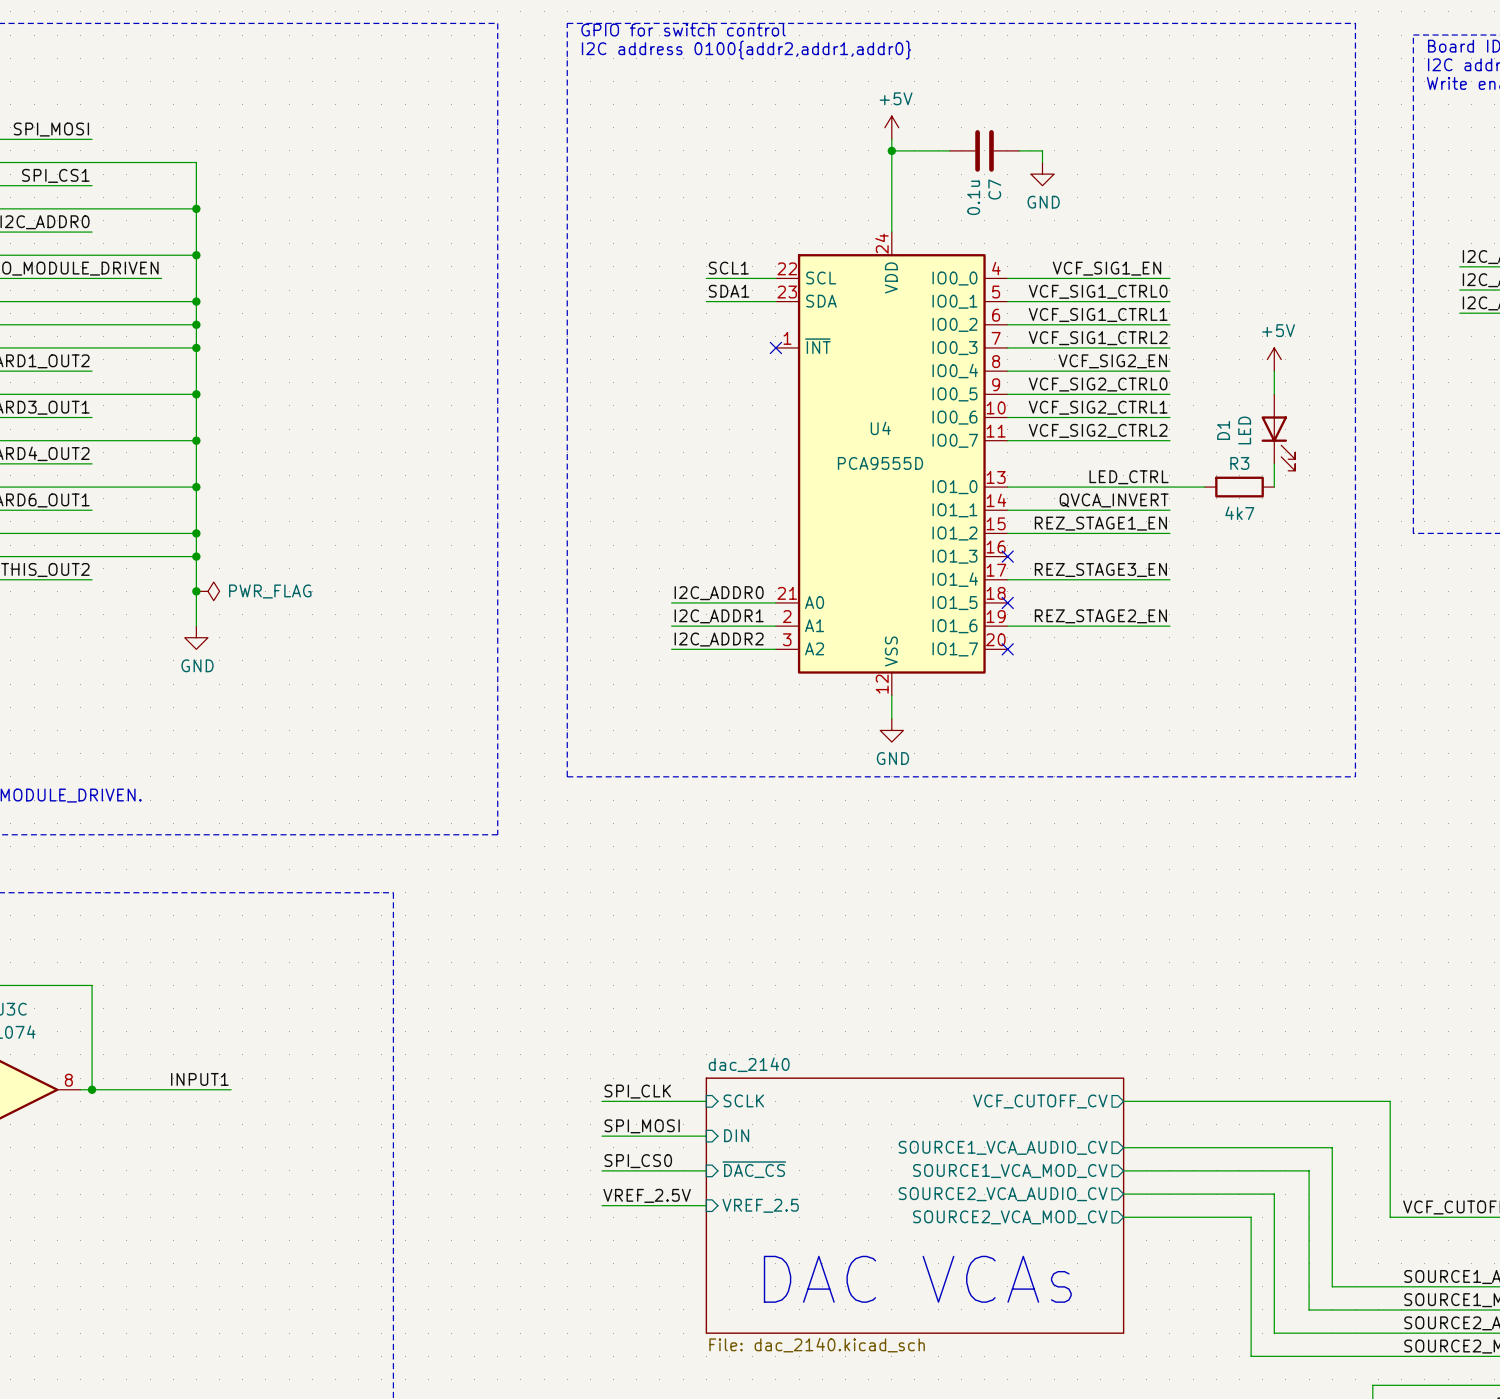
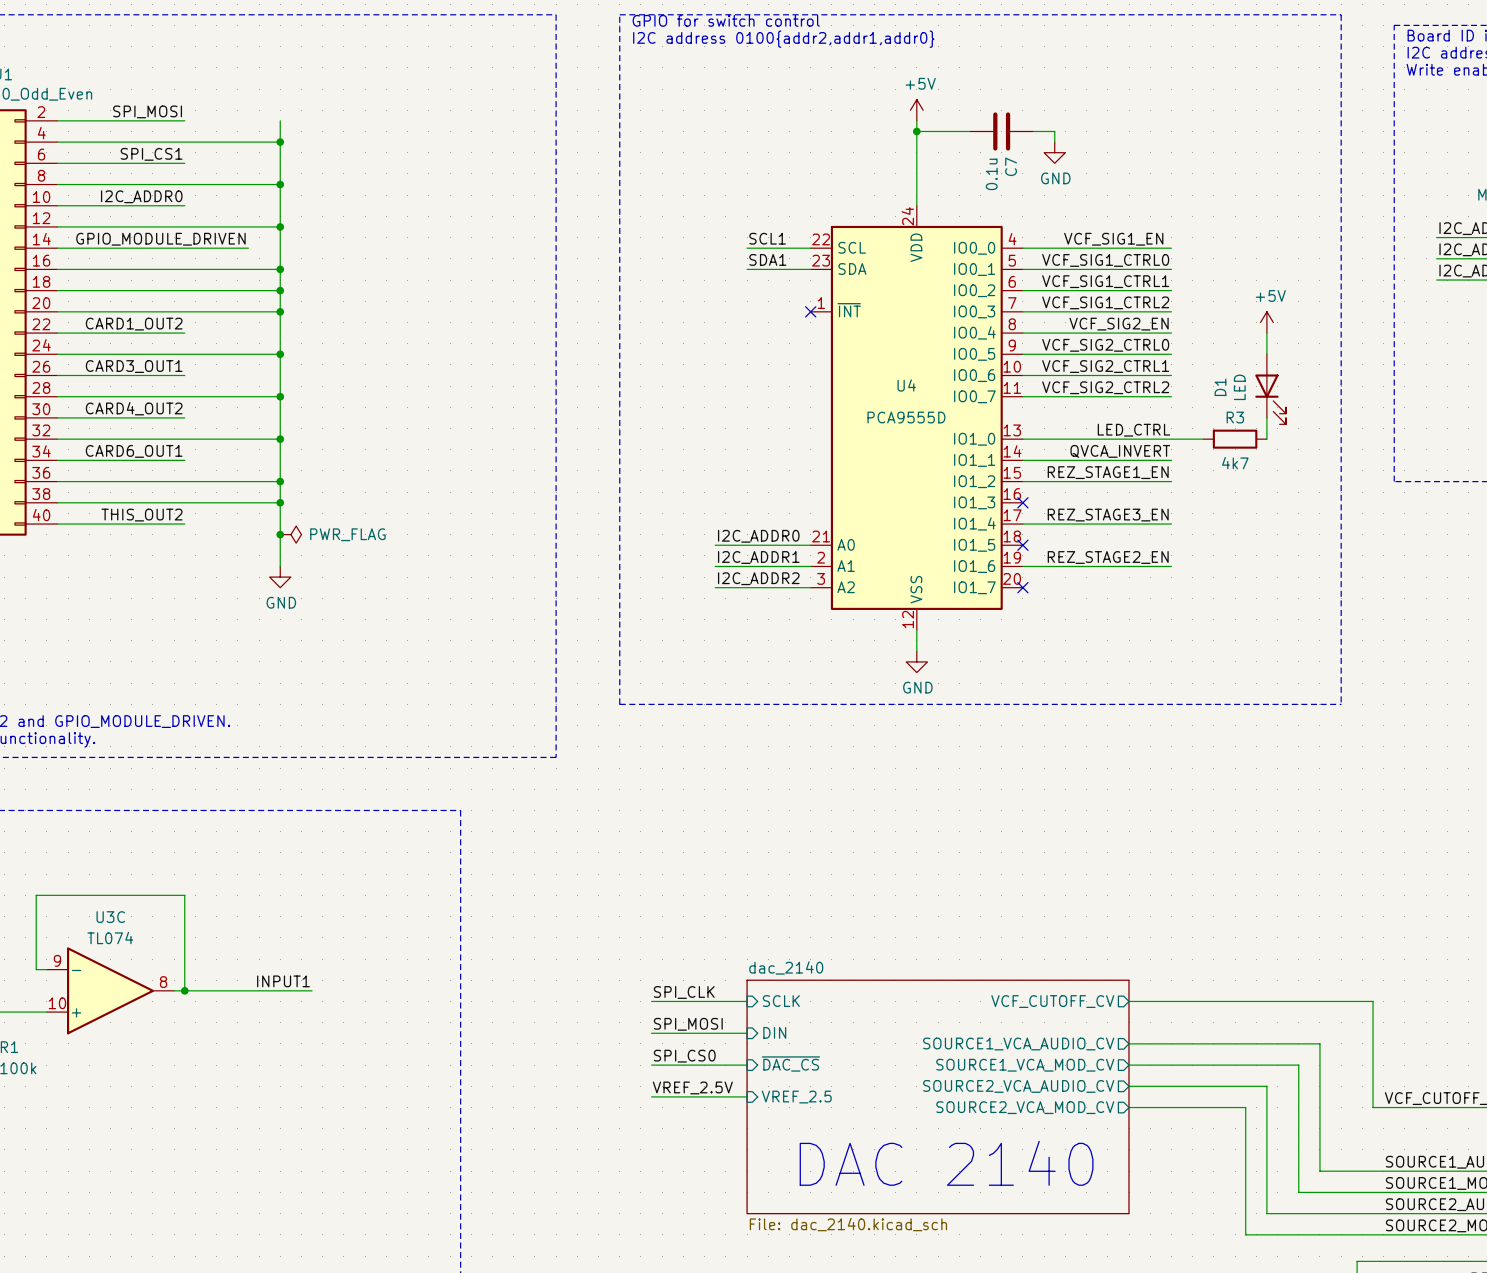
wire: none -> (280, 120) (280, 142)
junction: none -> (280, 142)
text: DAC VCAs (917, 1279) -> DAC 2140 (946, 1163)

